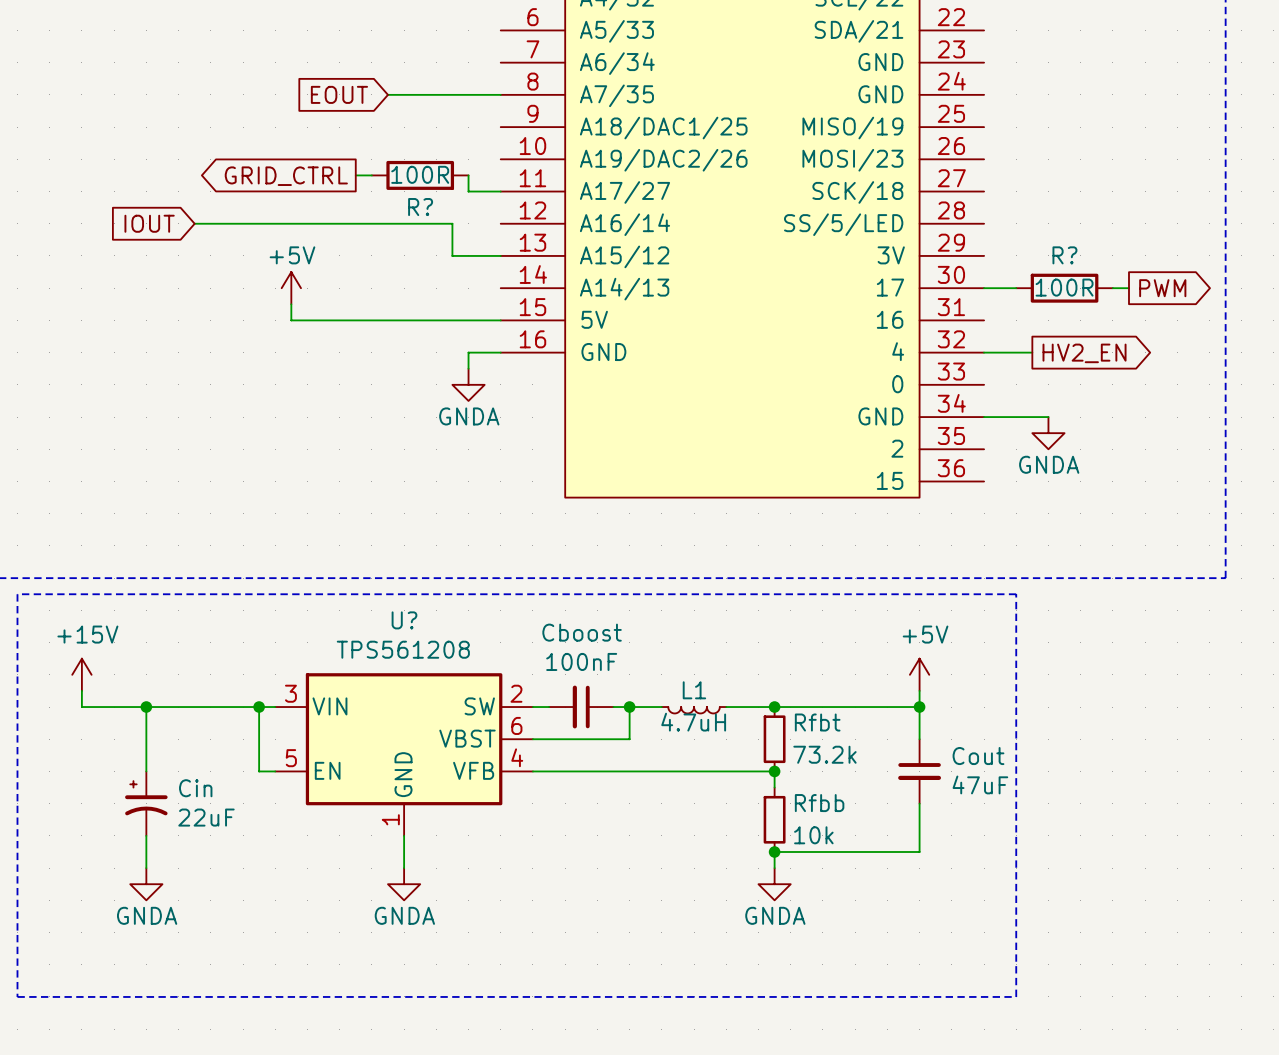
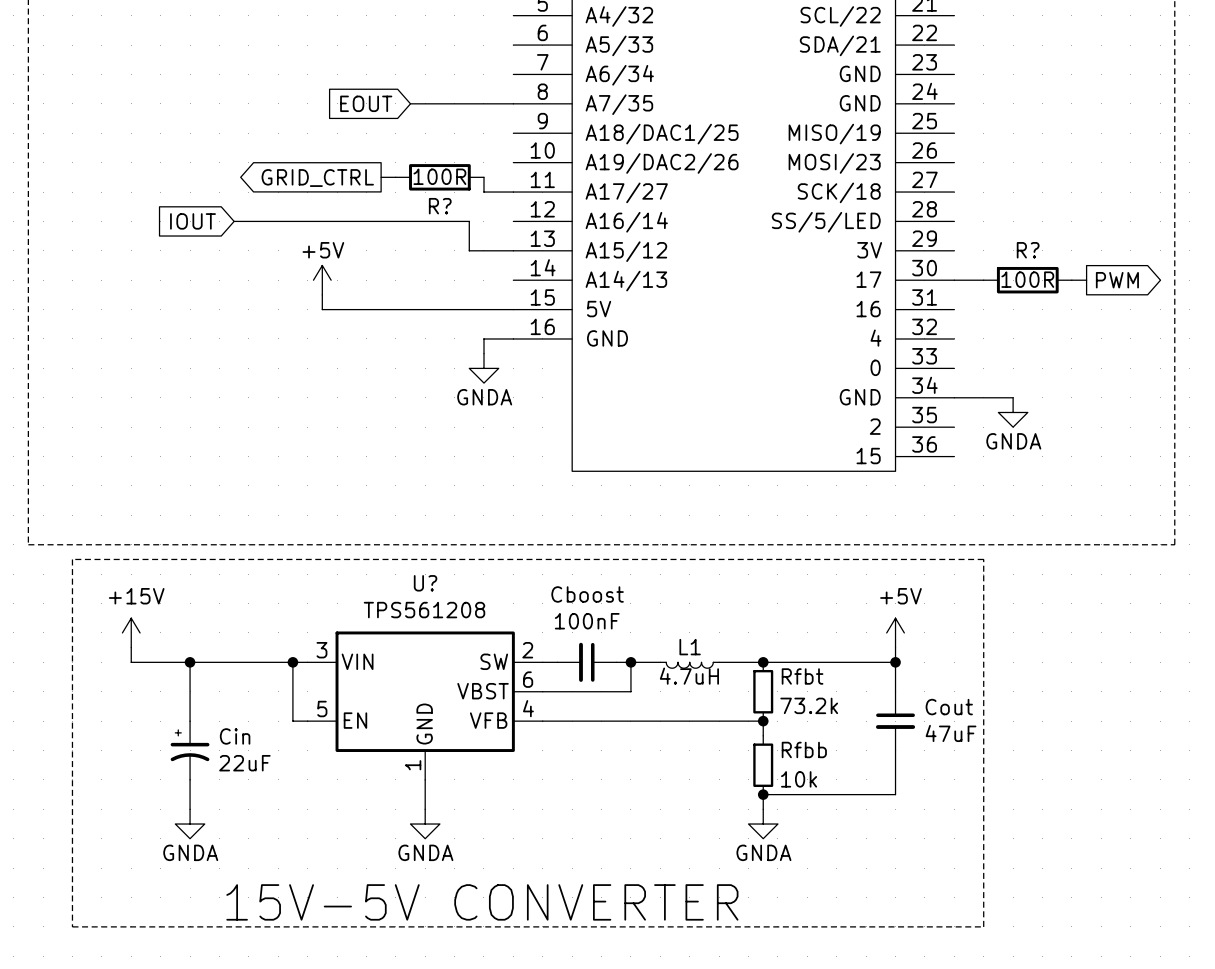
wire: (984, 352) (1032, 352) -> none
global label: HV2_EN (1084, 353) -> none
text: none -> 15V-5V CONVERTER (482, 902)

